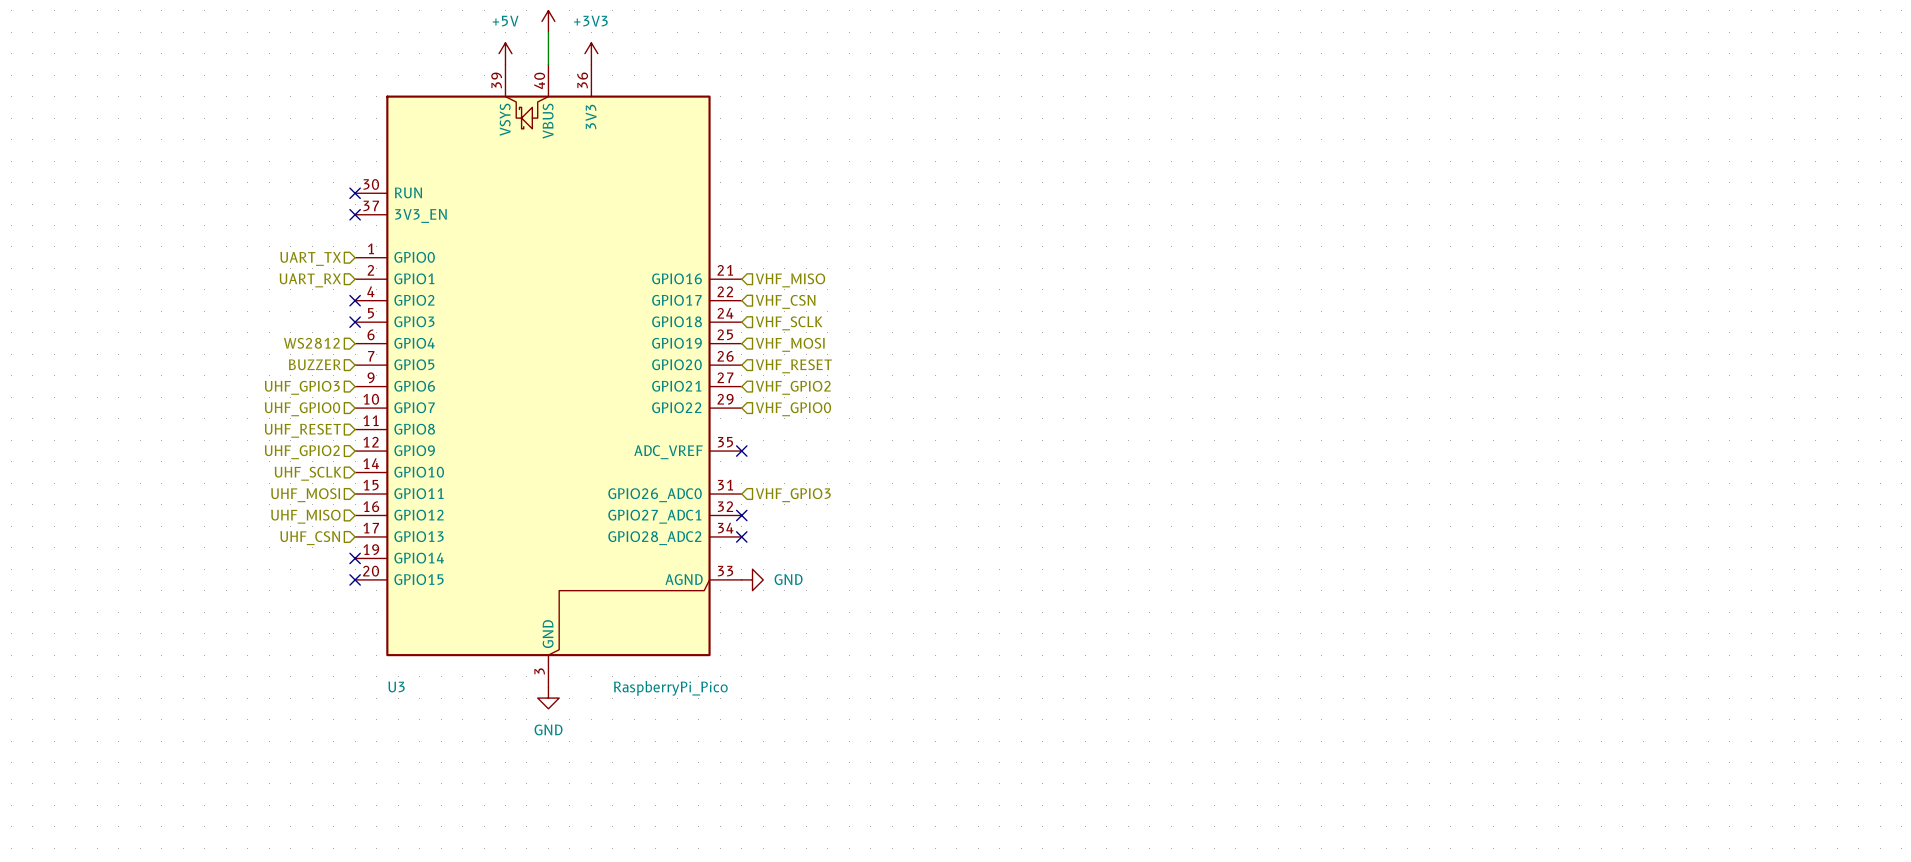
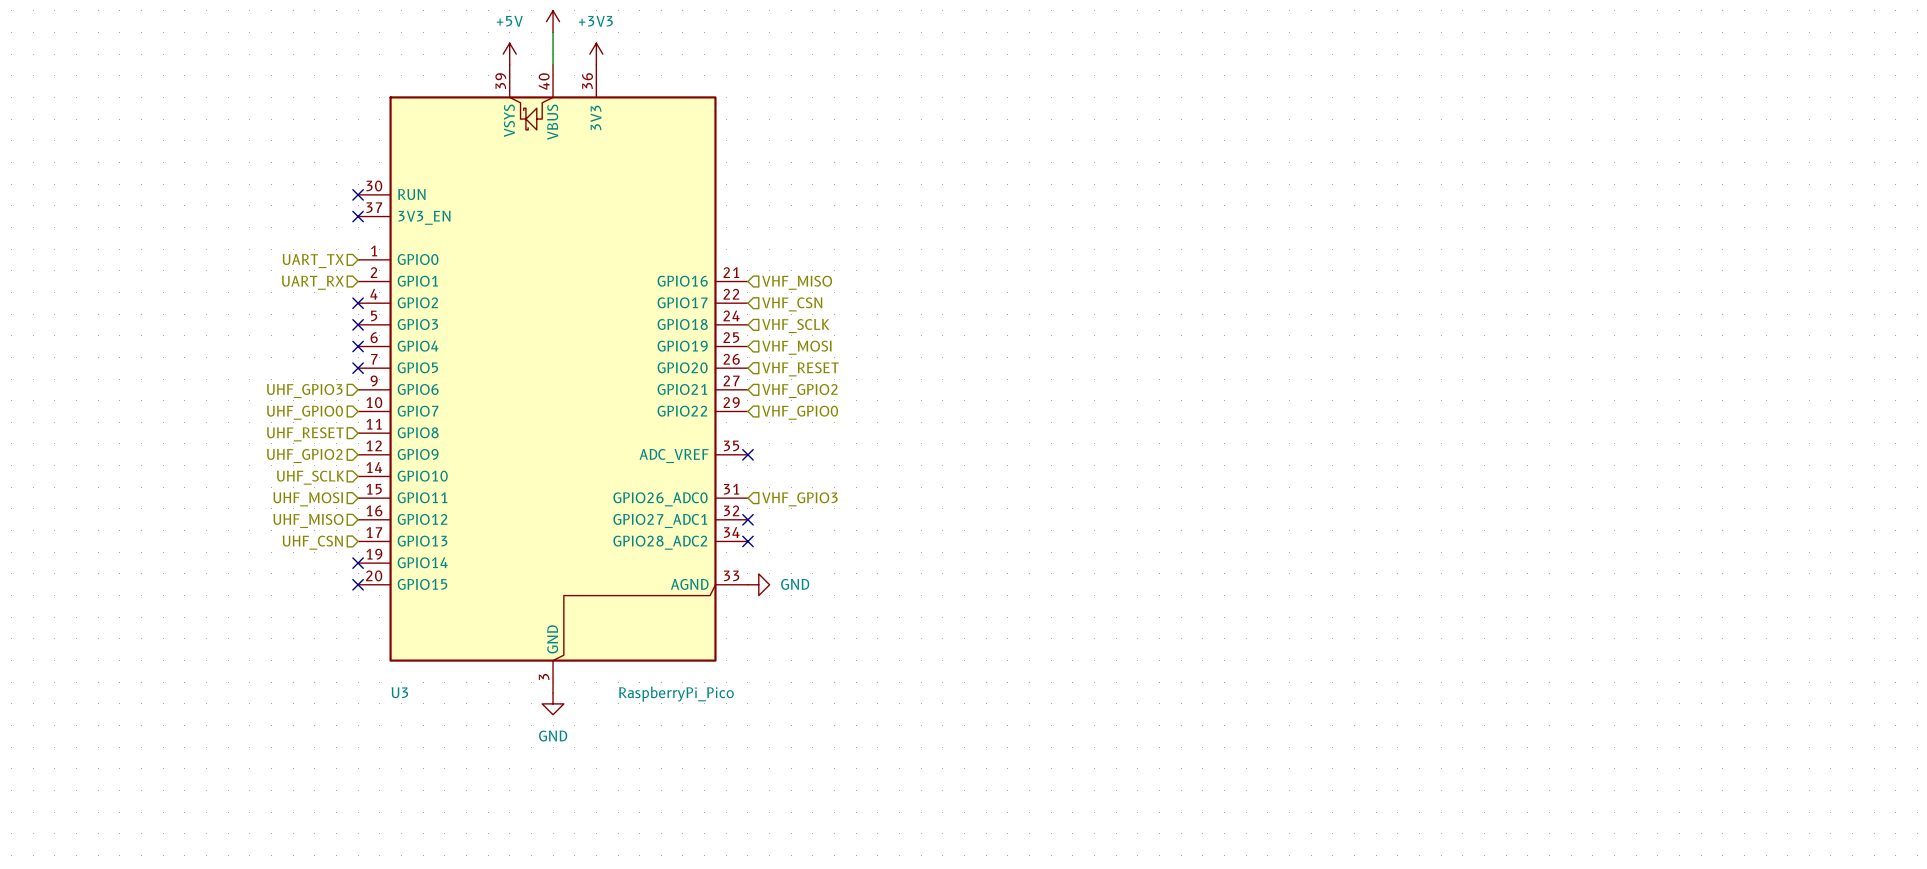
hierarchical label: WS2812 (311, 343) -> none
no-connect mark: none -> (358, 346)
hierarchical label: BUZZER (314, 364) -> none
no-connect mark: none -> (358, 368)

